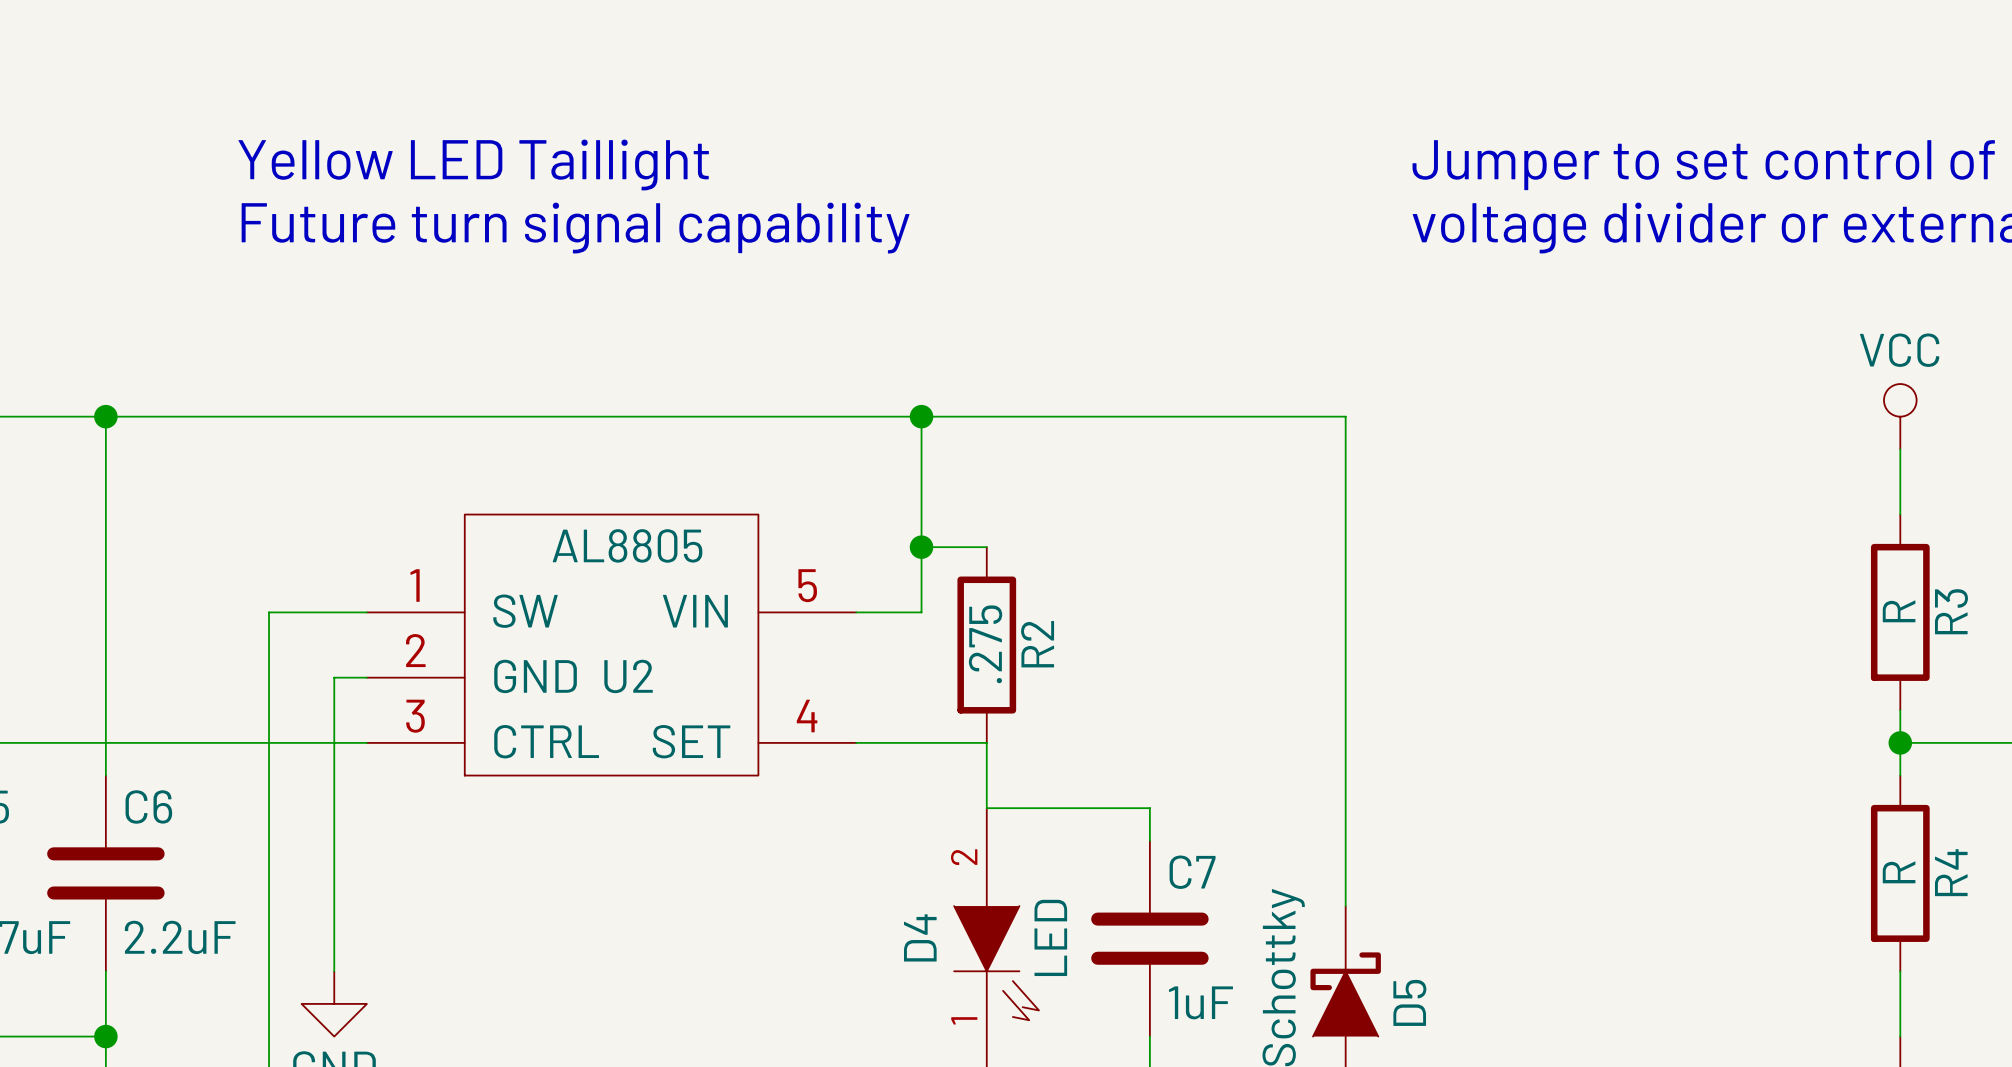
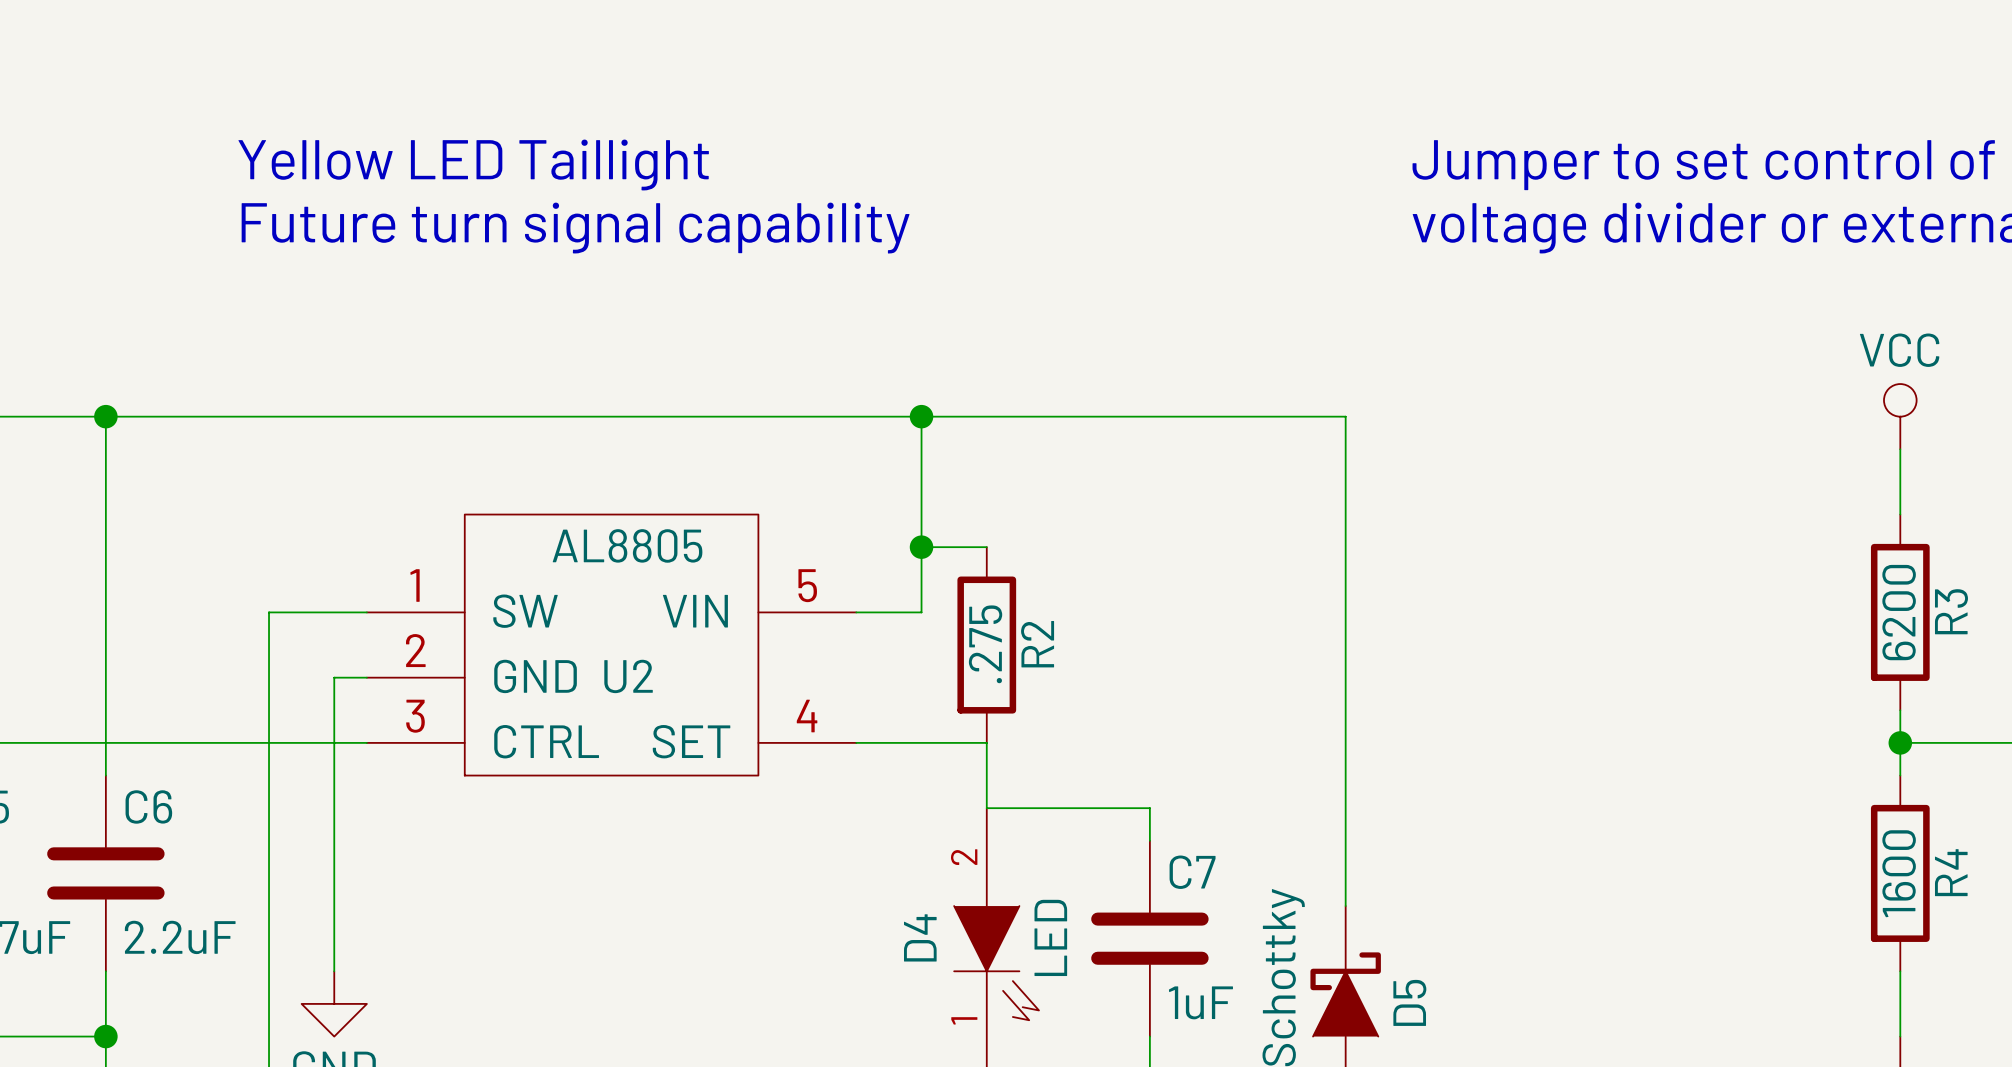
R3 value: R (1899, 611) -> 6200 (1899, 612)
R4 value: R (1899, 872) -> 1600 (1899, 873)

